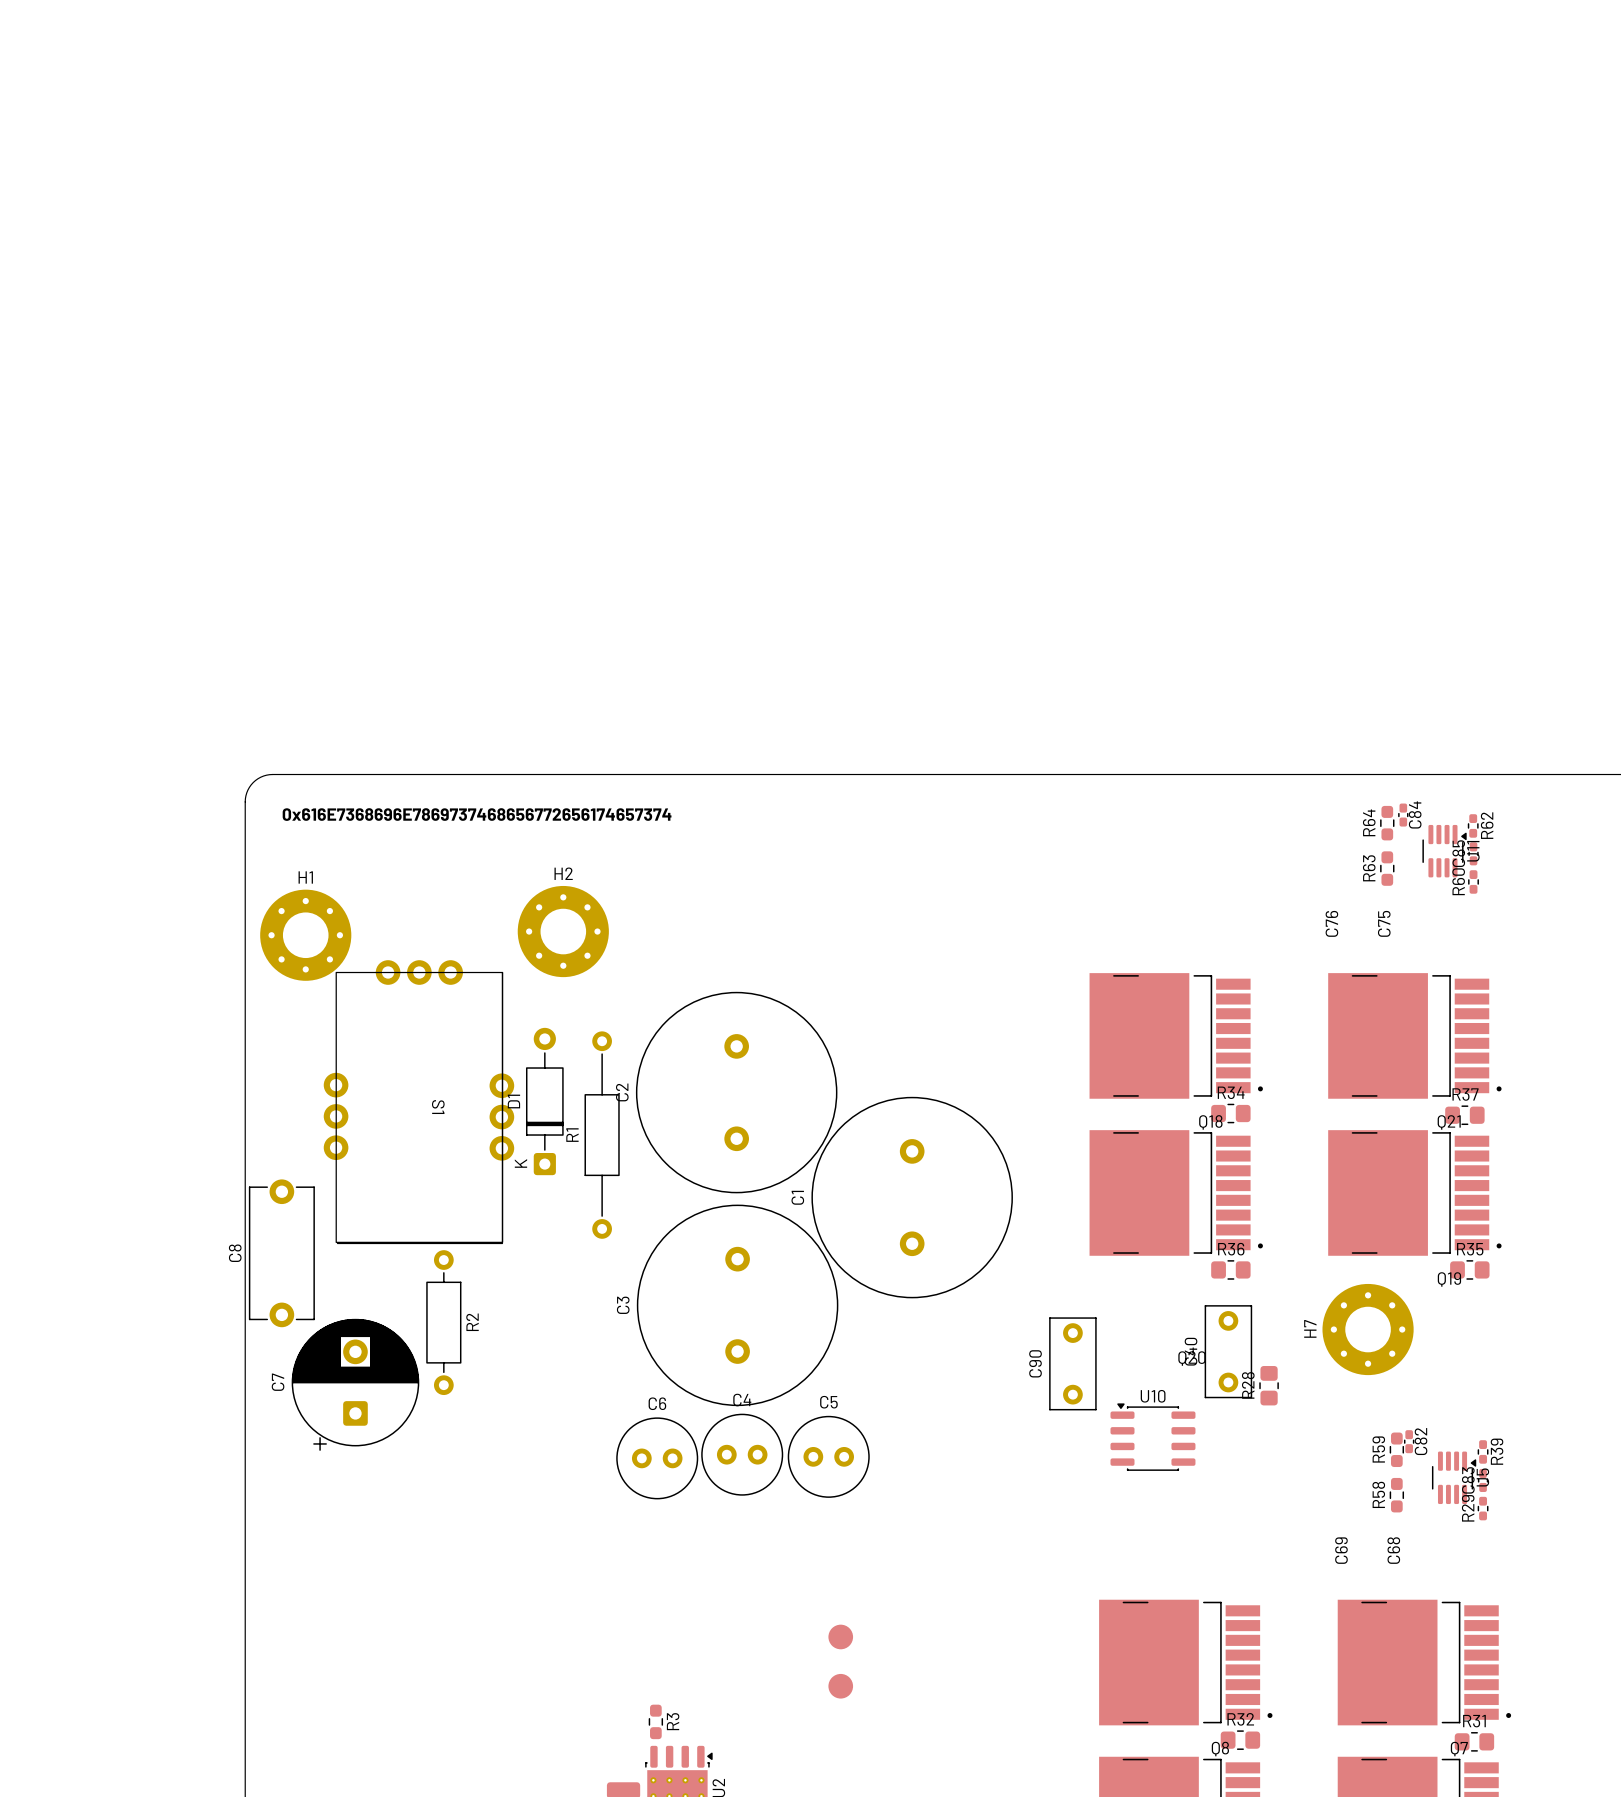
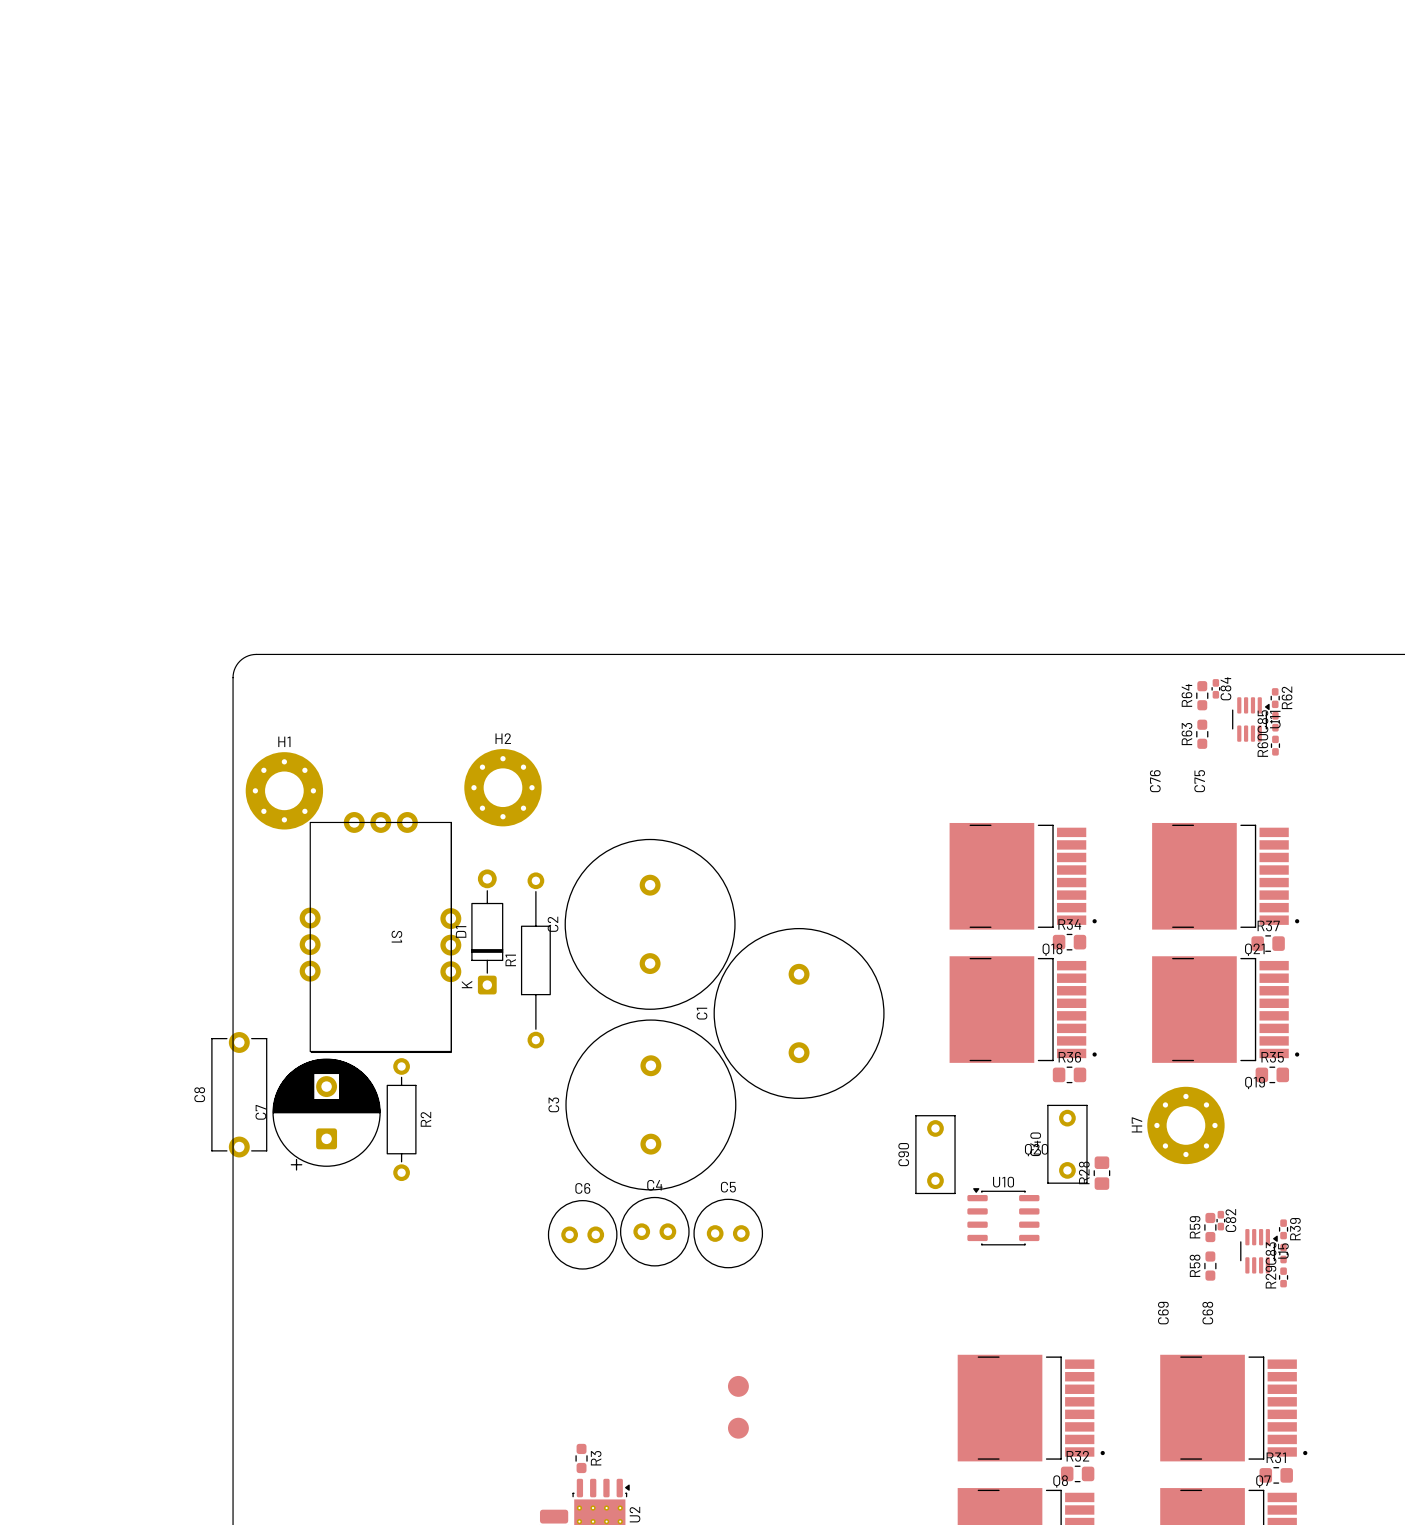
text: 0x616E7368696E7869737468656772656174657374 (477, 814) -> none
C8 position: (281, 1253) -> (239, 1094)
C7 position: (355, 1384) -> (326, 1114)

